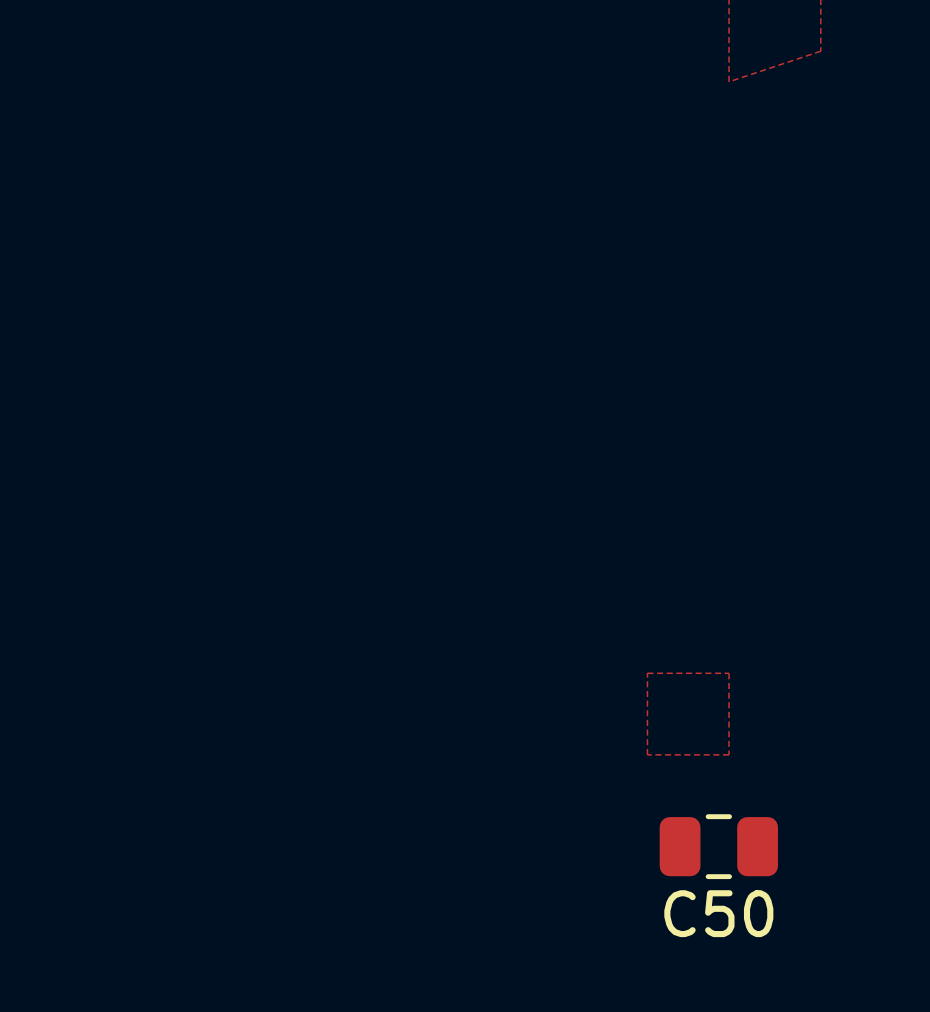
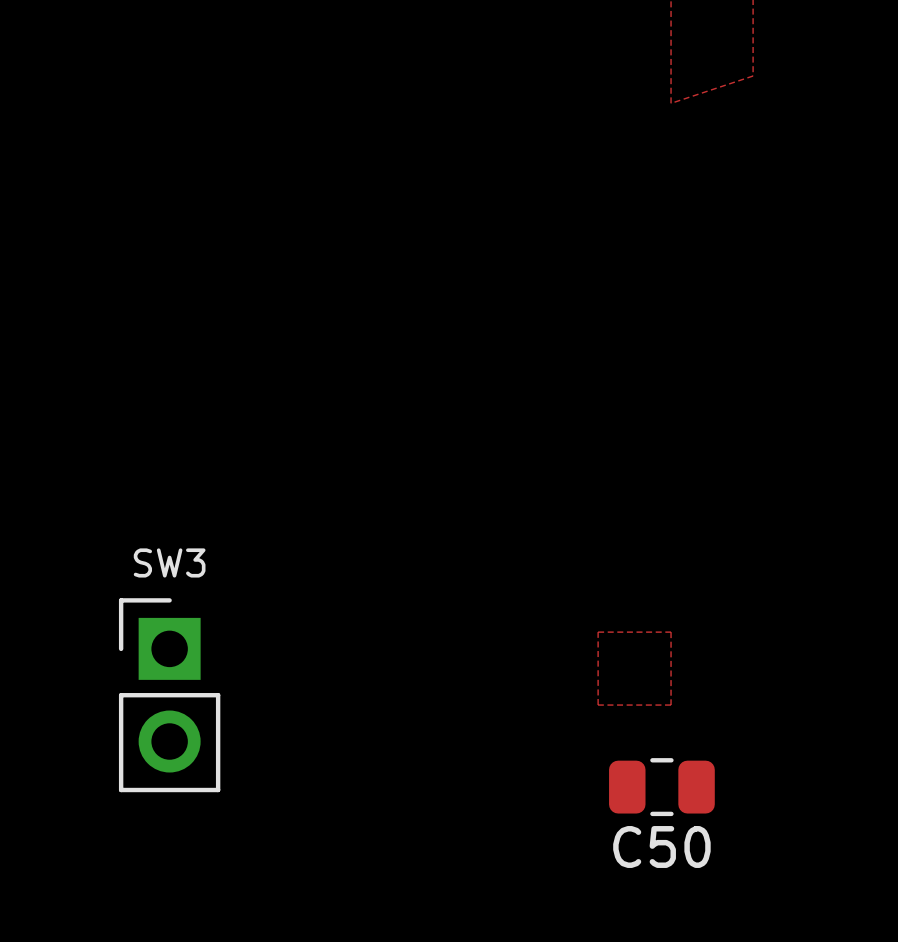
SW3: none -> (169, 695)

